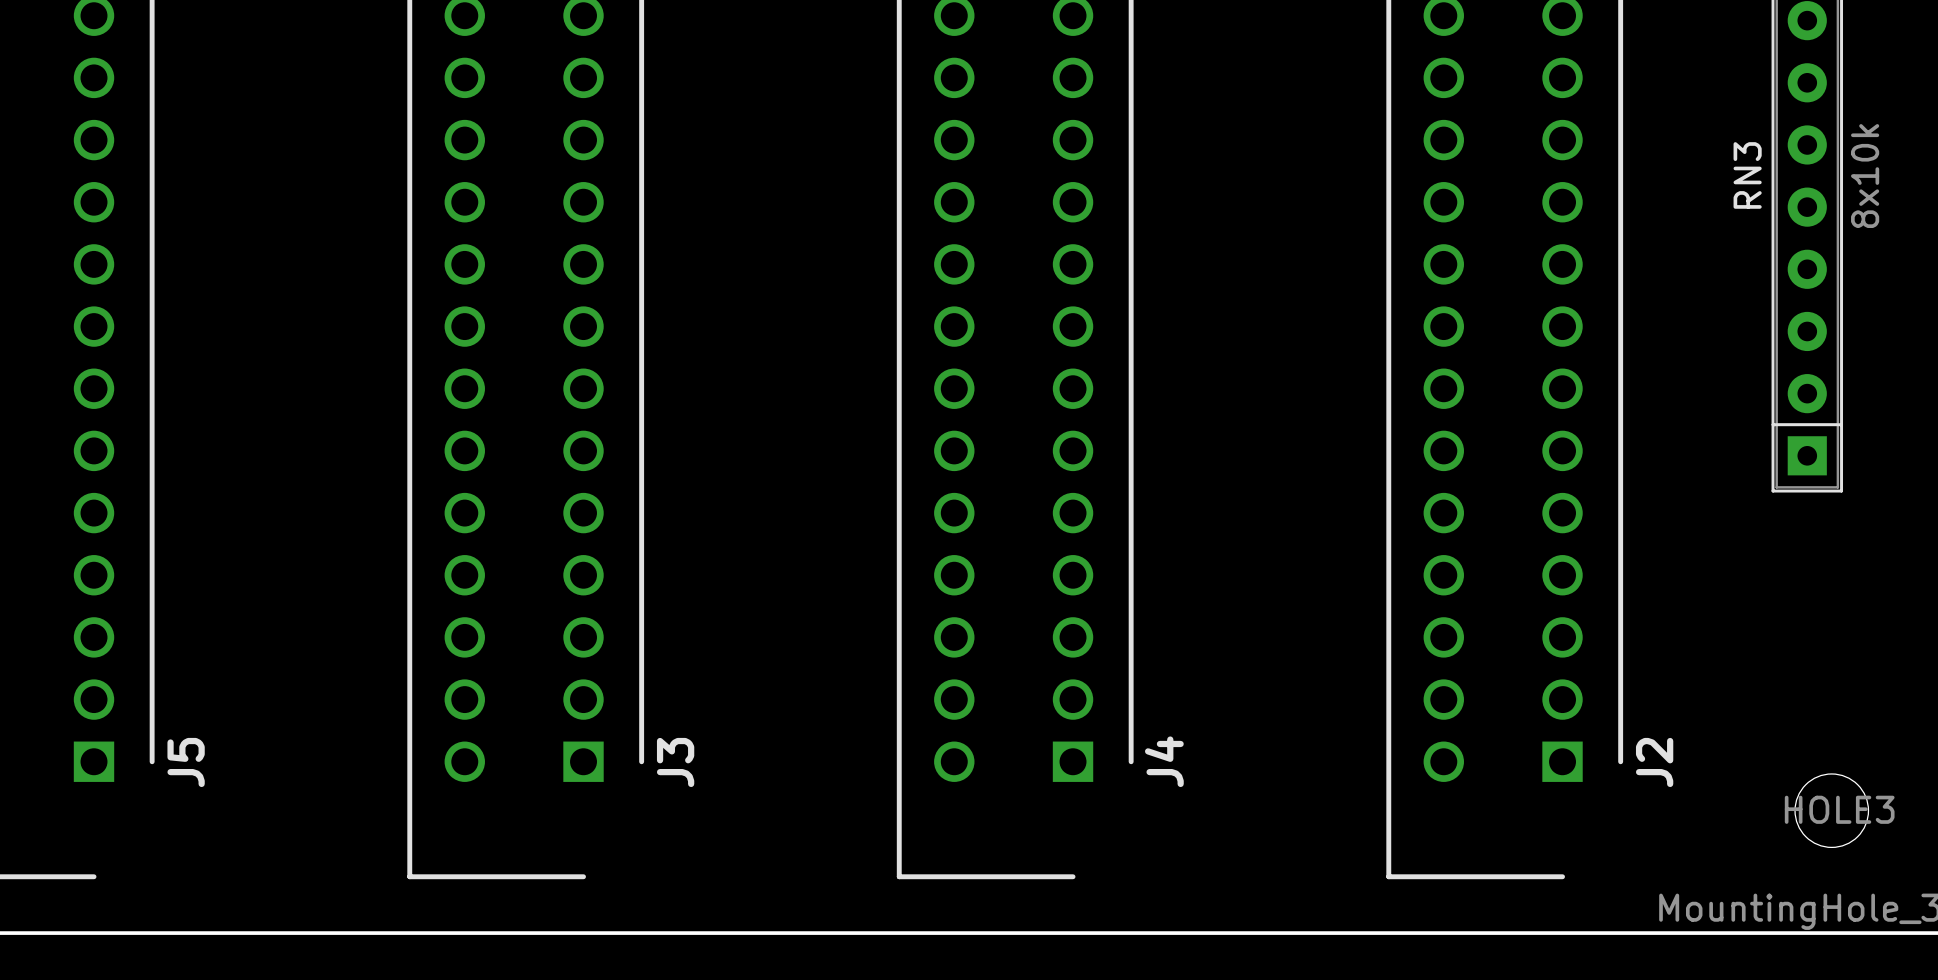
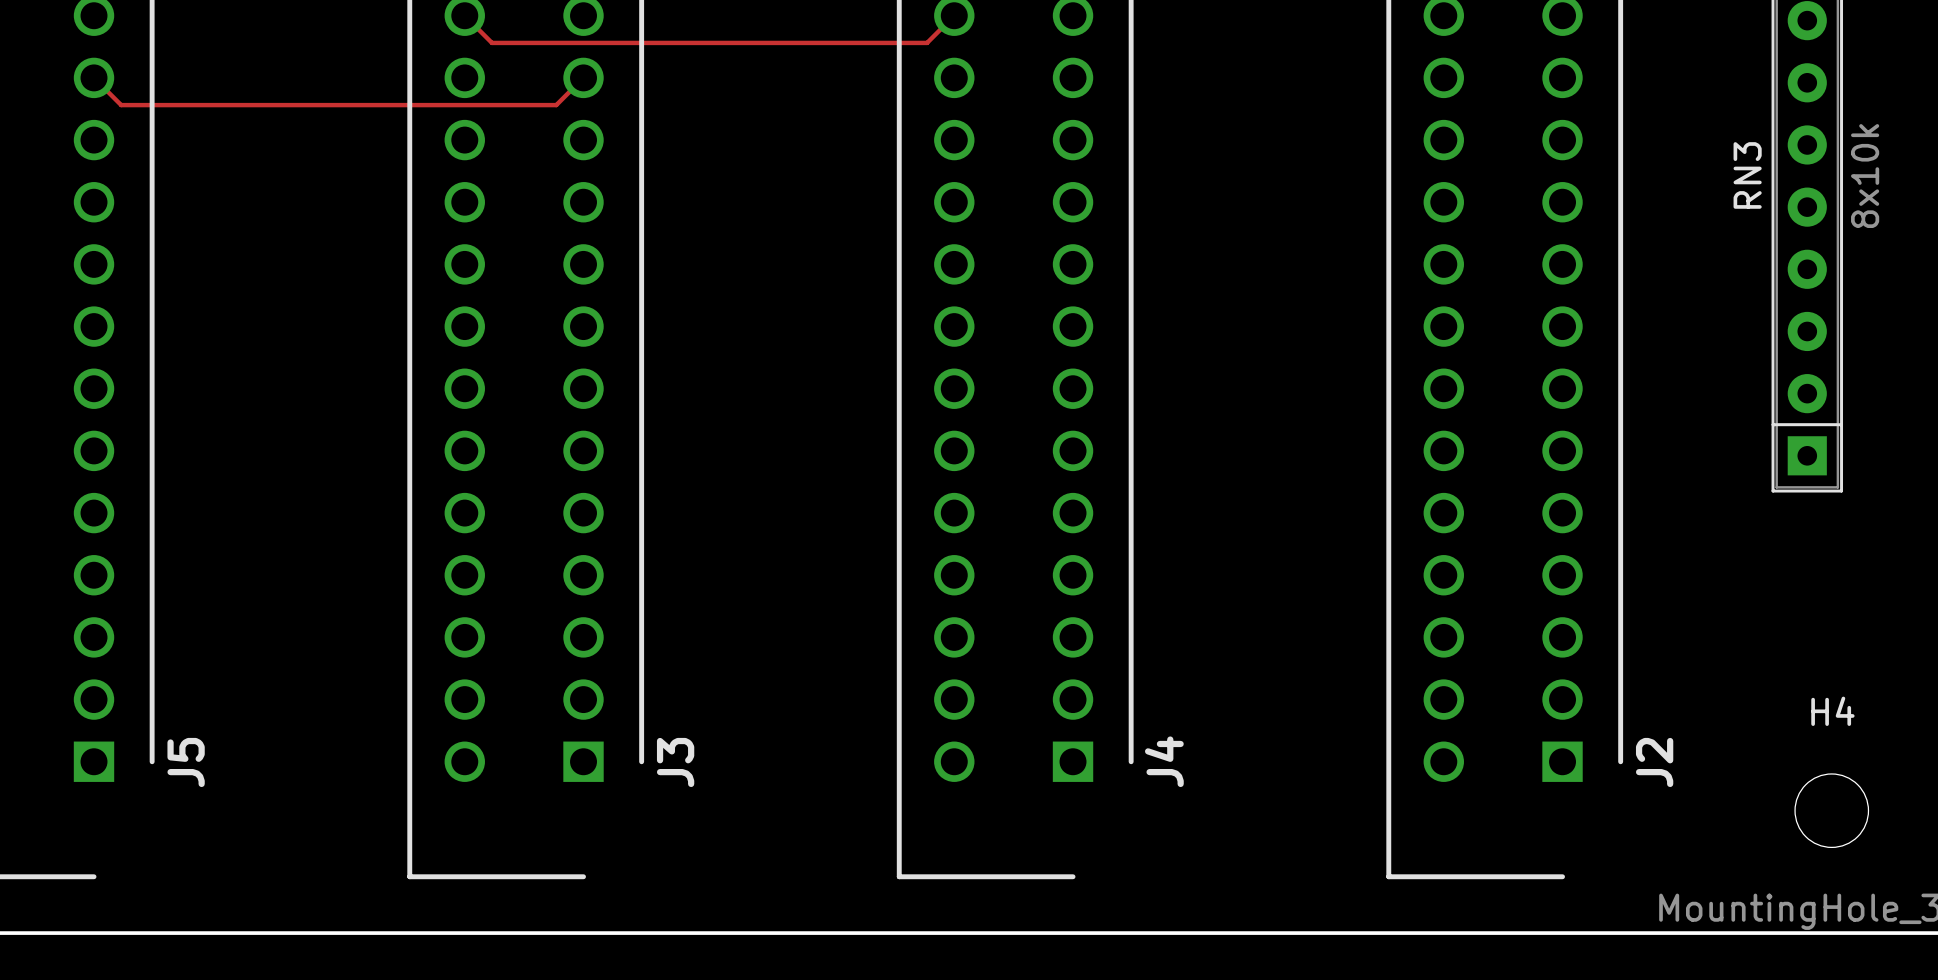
top track: none -> (464, 15) (491, 42) (927, 42) (954, 15)
top track: none -> (94, 77) (121, 105) (556, 105) (583, 77)
HOLE3 name: HOLE3 (1839, 809) -> H4 (1832, 711)

